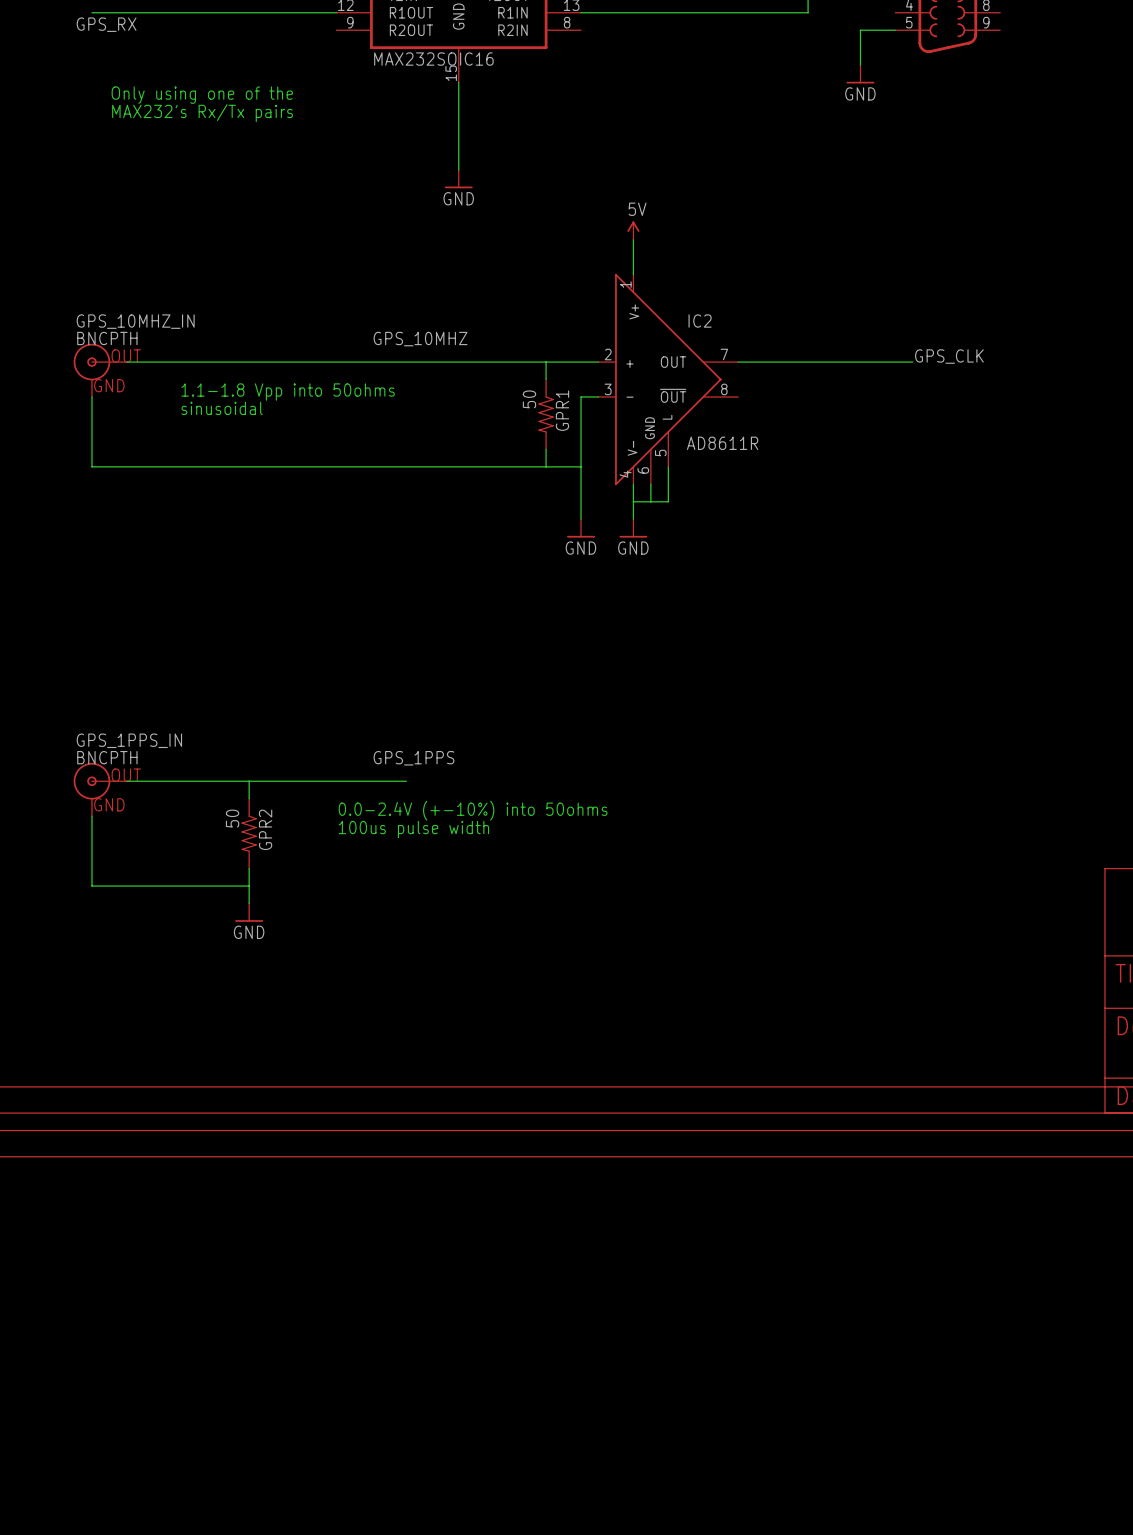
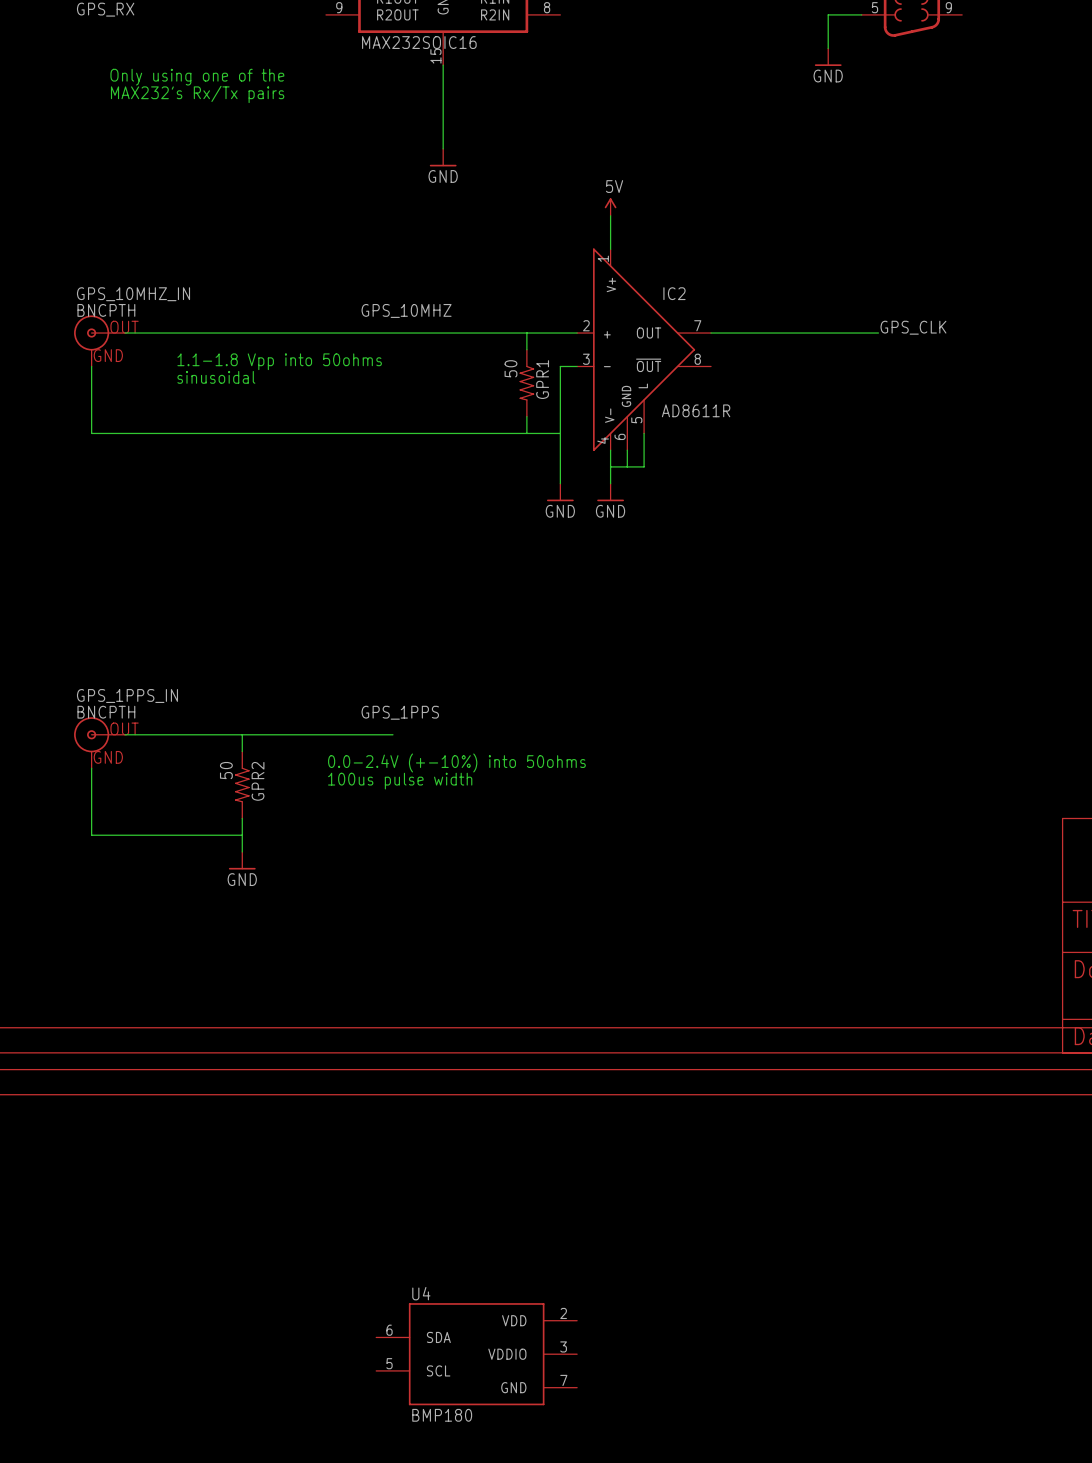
U4: none -> BMP180 (476, 1354)

